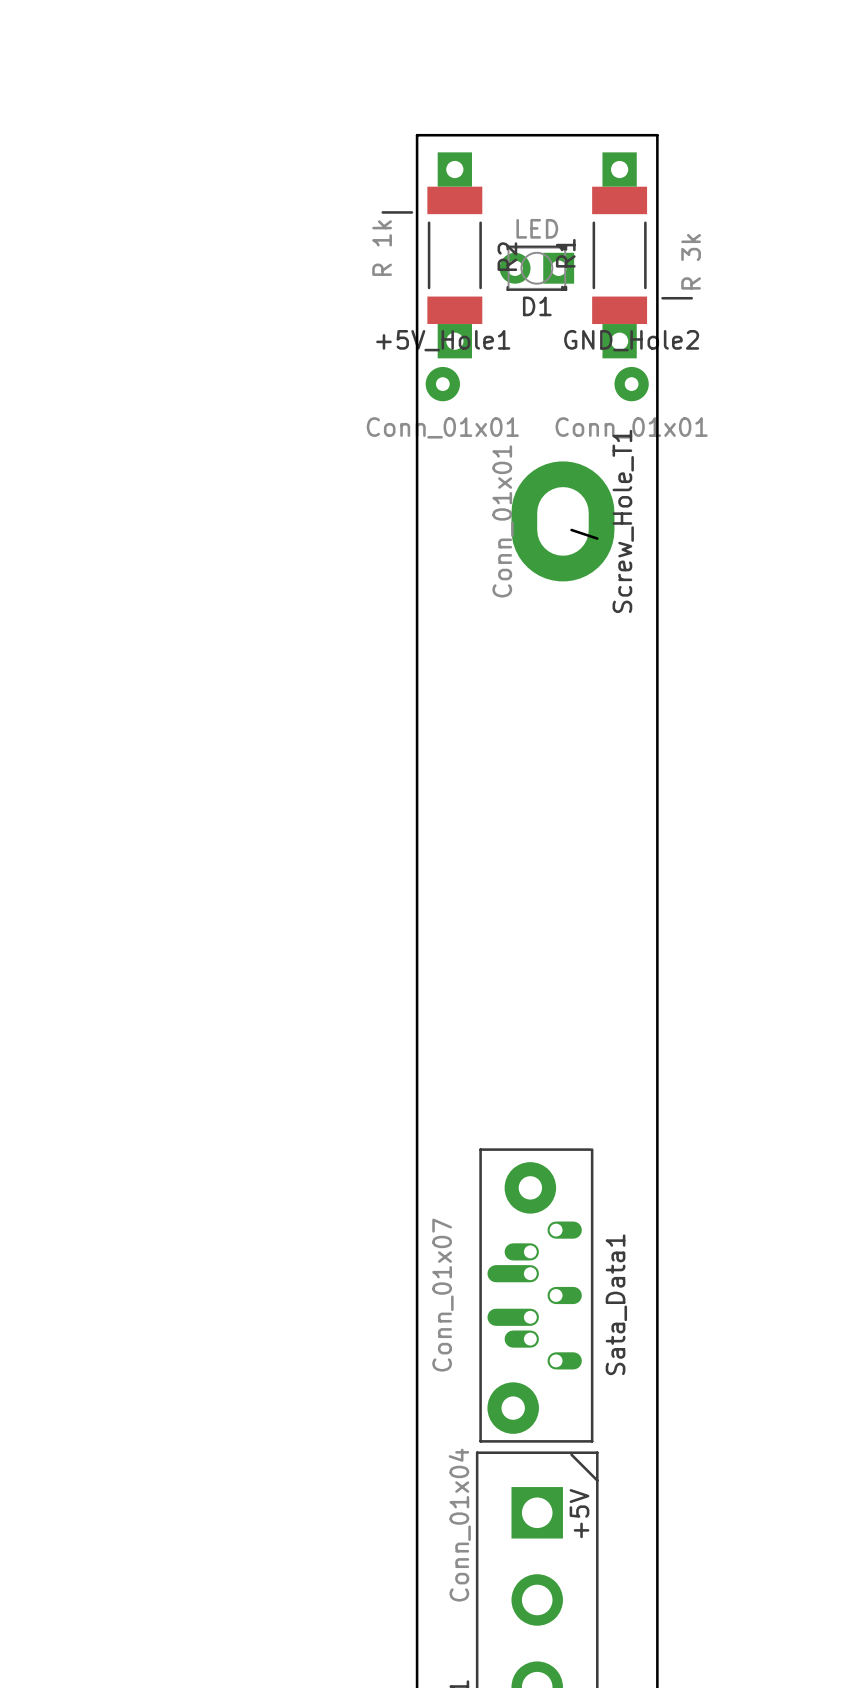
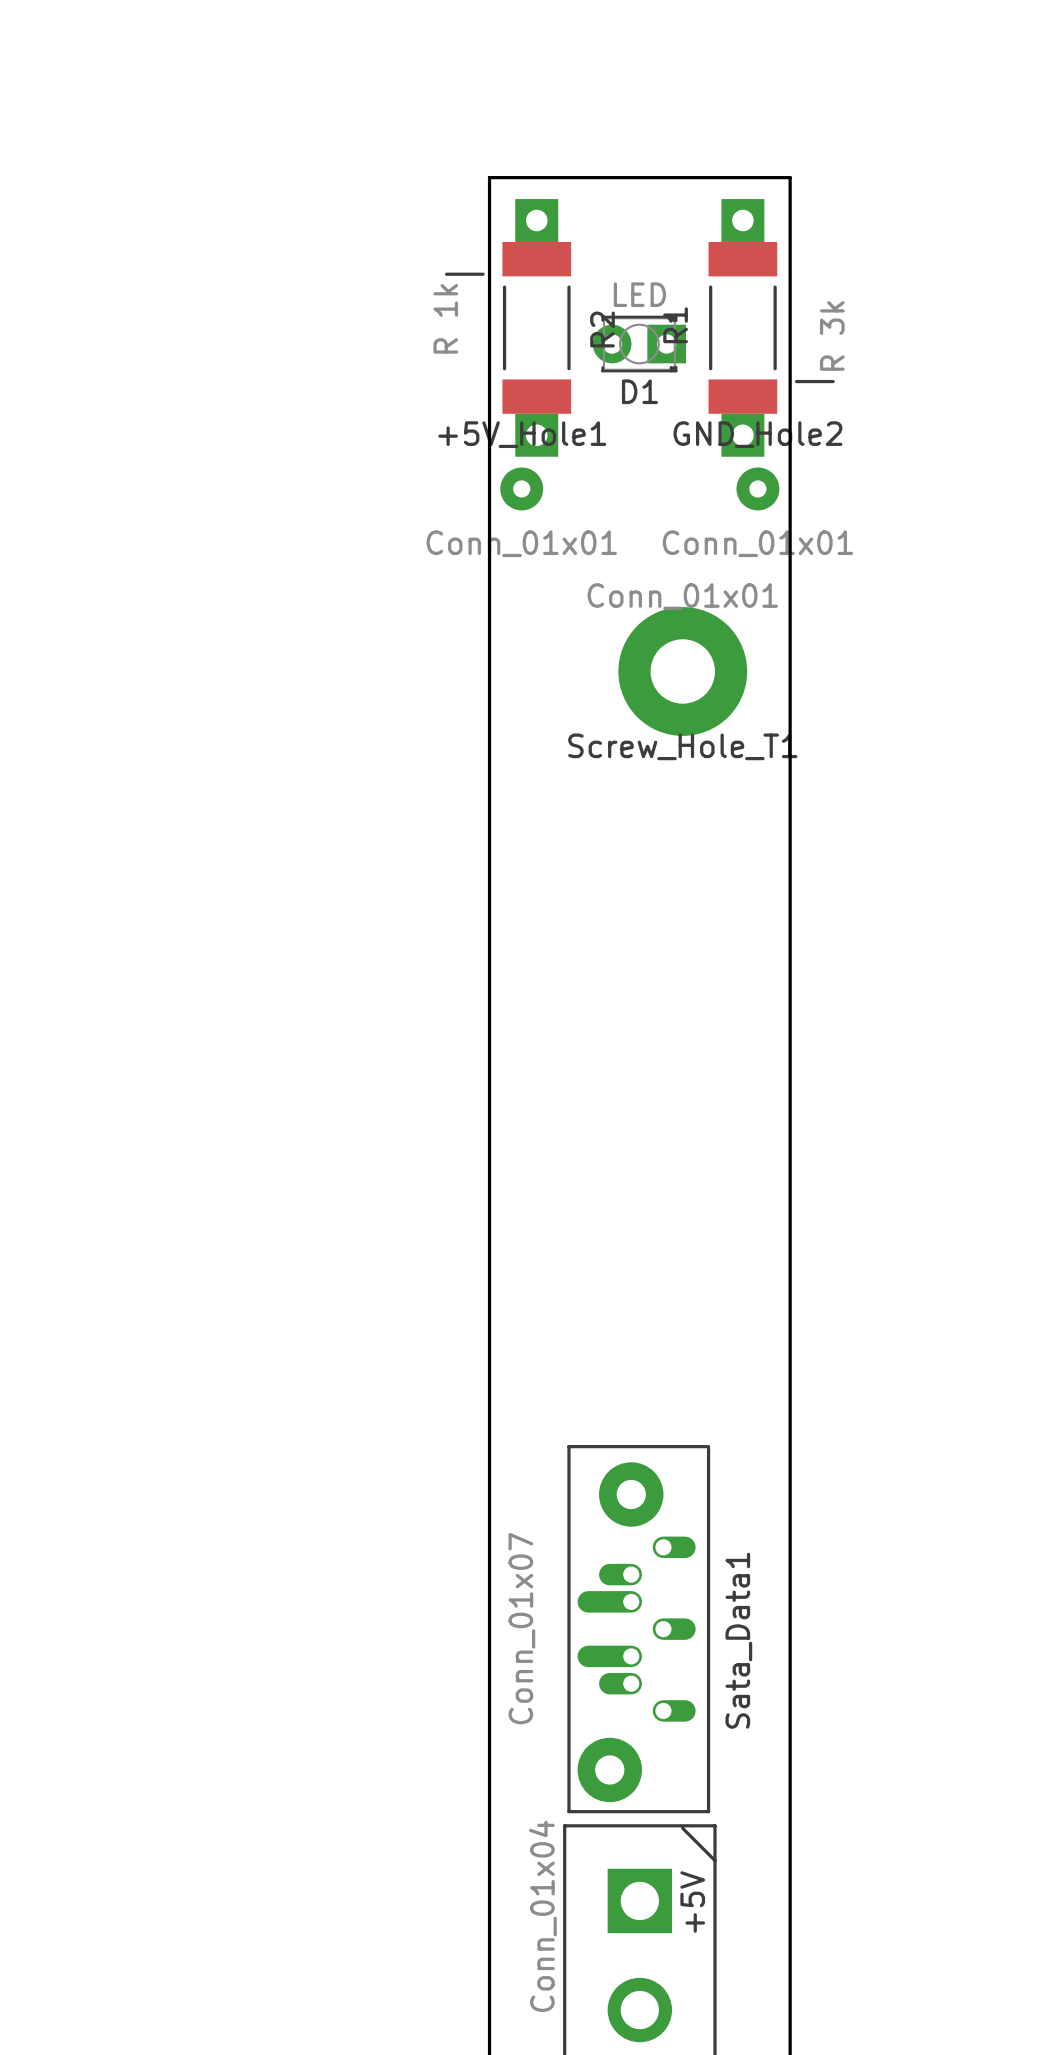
Screw_Hole_T1 footprint: [511, 461, 615, 582] -> [618, 607, 748, 736]
Screw_Hole_T1 value position: Conn_01x01 (503, 521) -> Conn_01x01 (682, 596)
Screw_Hole_T1 name position: Screw_Hole_T1 (623, 521) -> Screw_Hole_T1 (682, 746)
board edge: (571, 529) (597, 538) -> none

